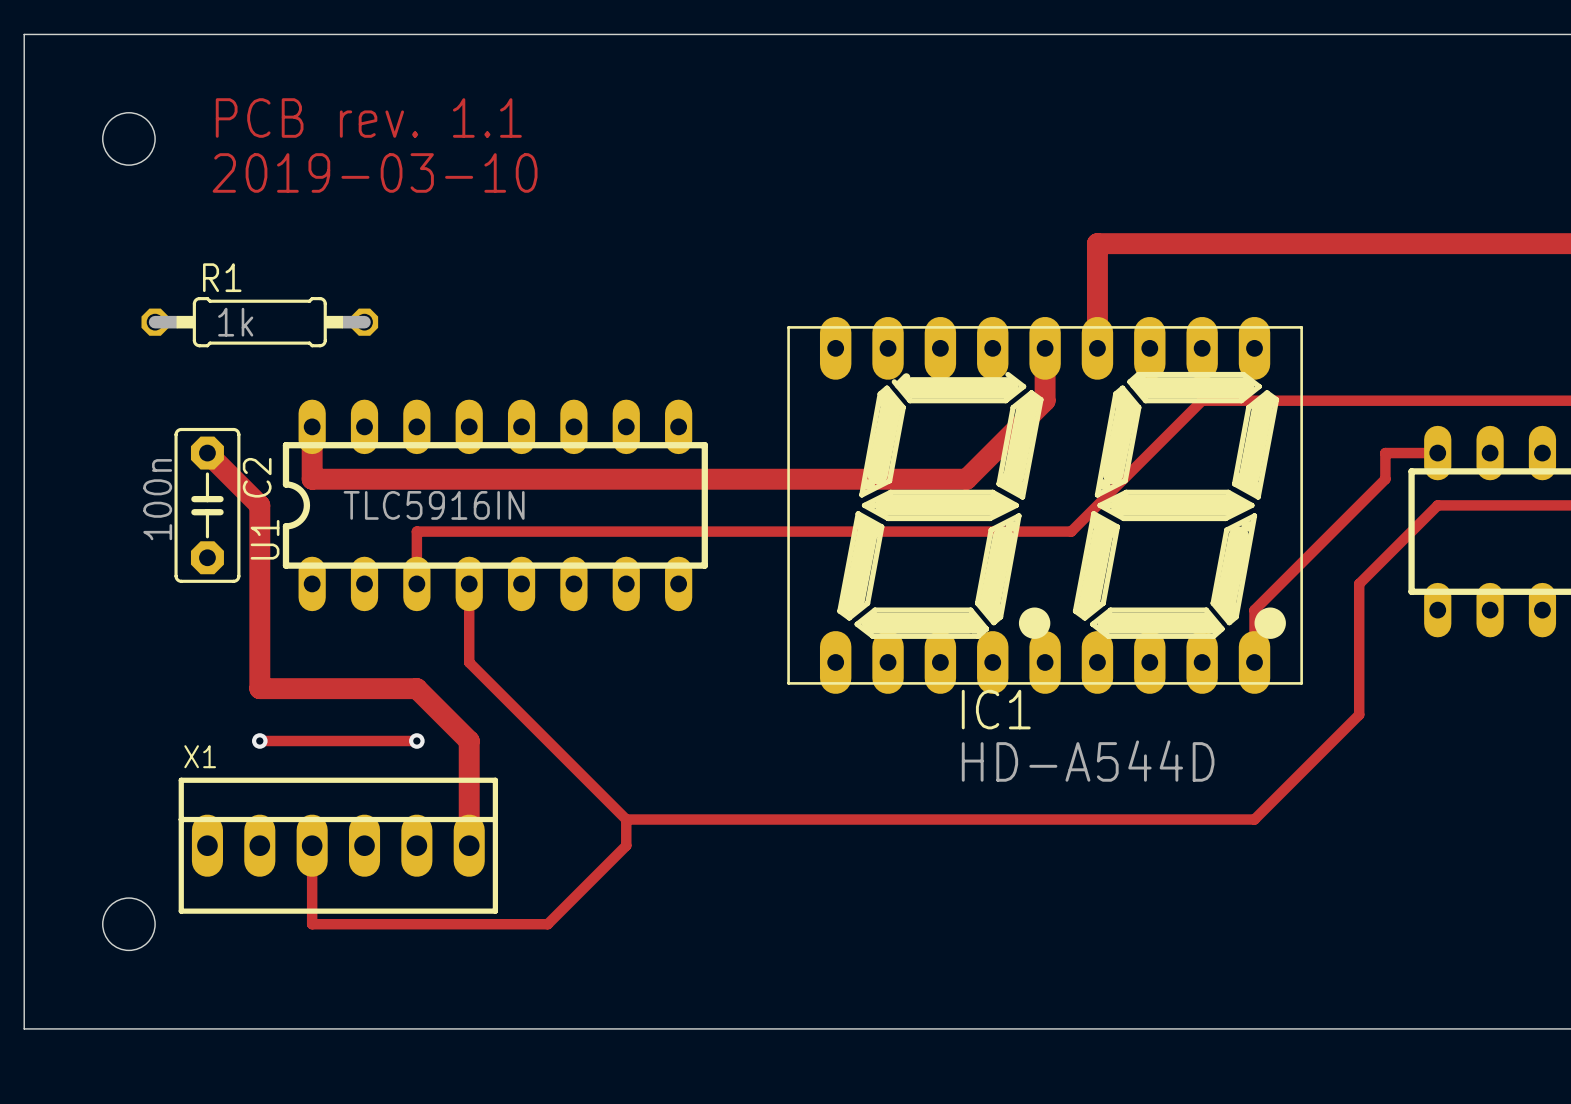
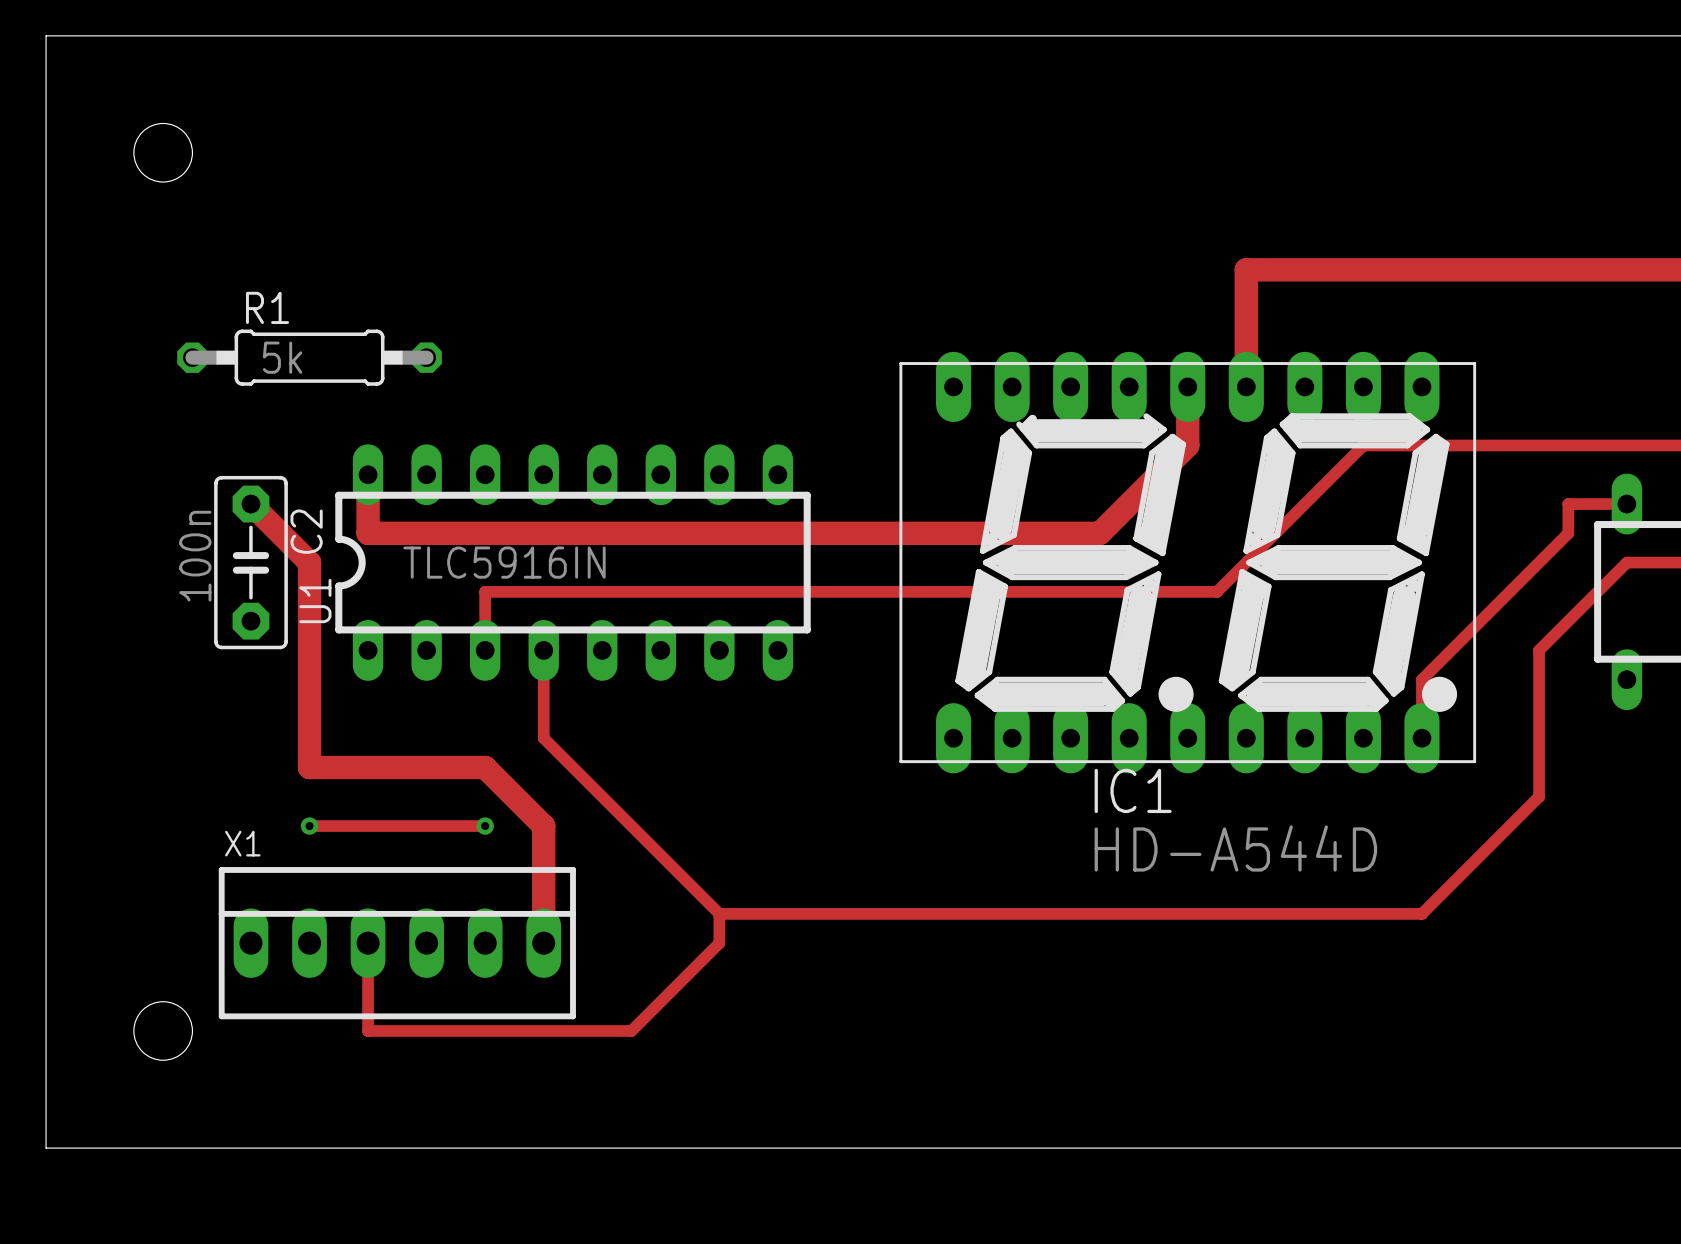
text: PCB rev. 1.1 (368, 118) -> none
text: 2019-03-10 (375, 172) -> none
R1 value: 1k (235, 322) -> 5k (282, 357)

